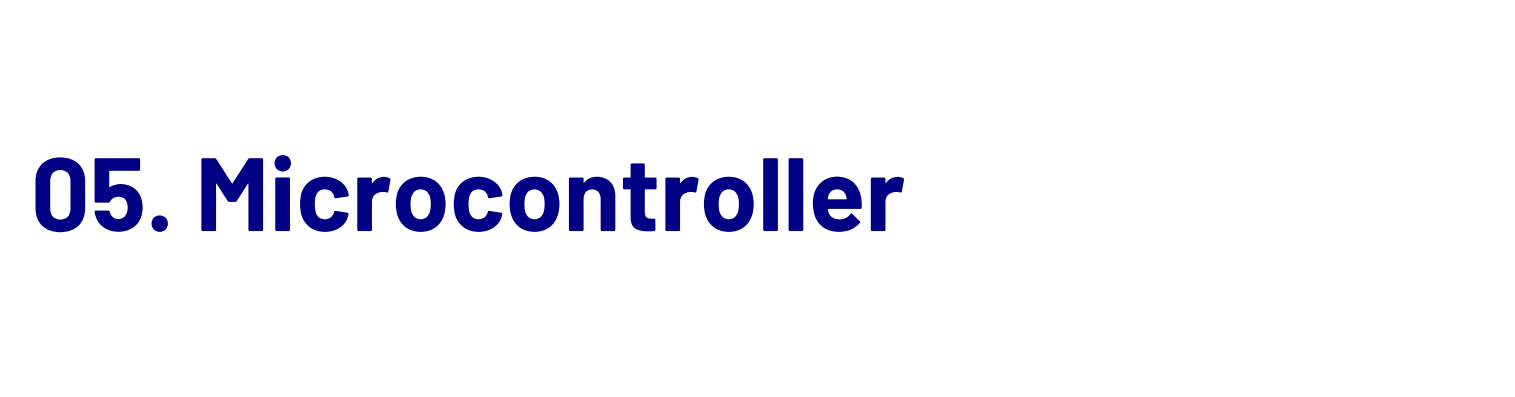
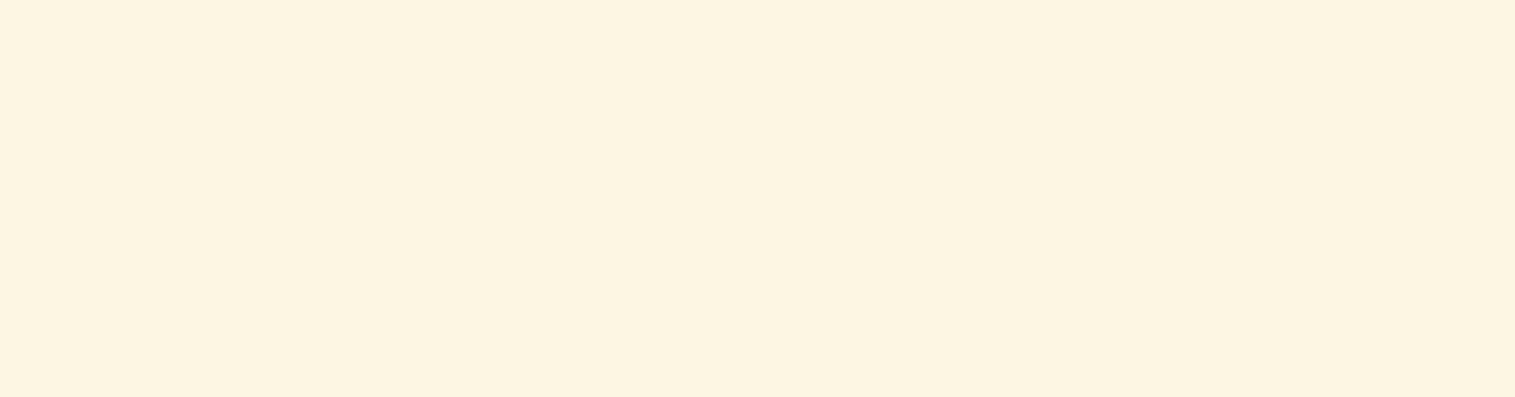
text: 05. Microcontroller (469, 193) -> none

